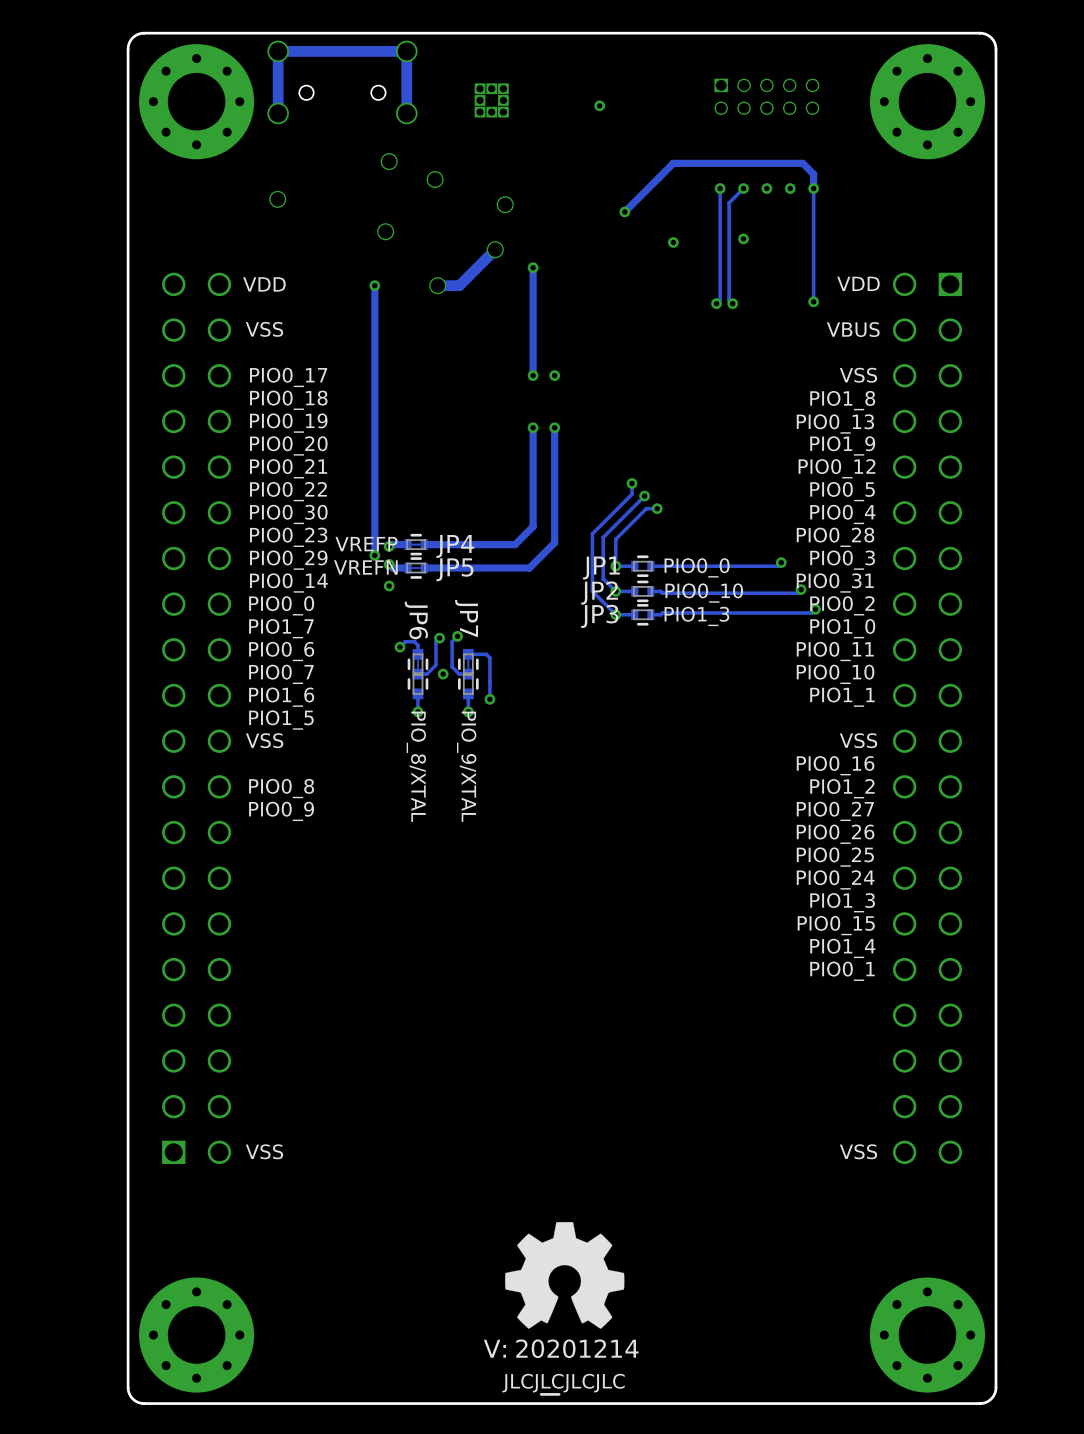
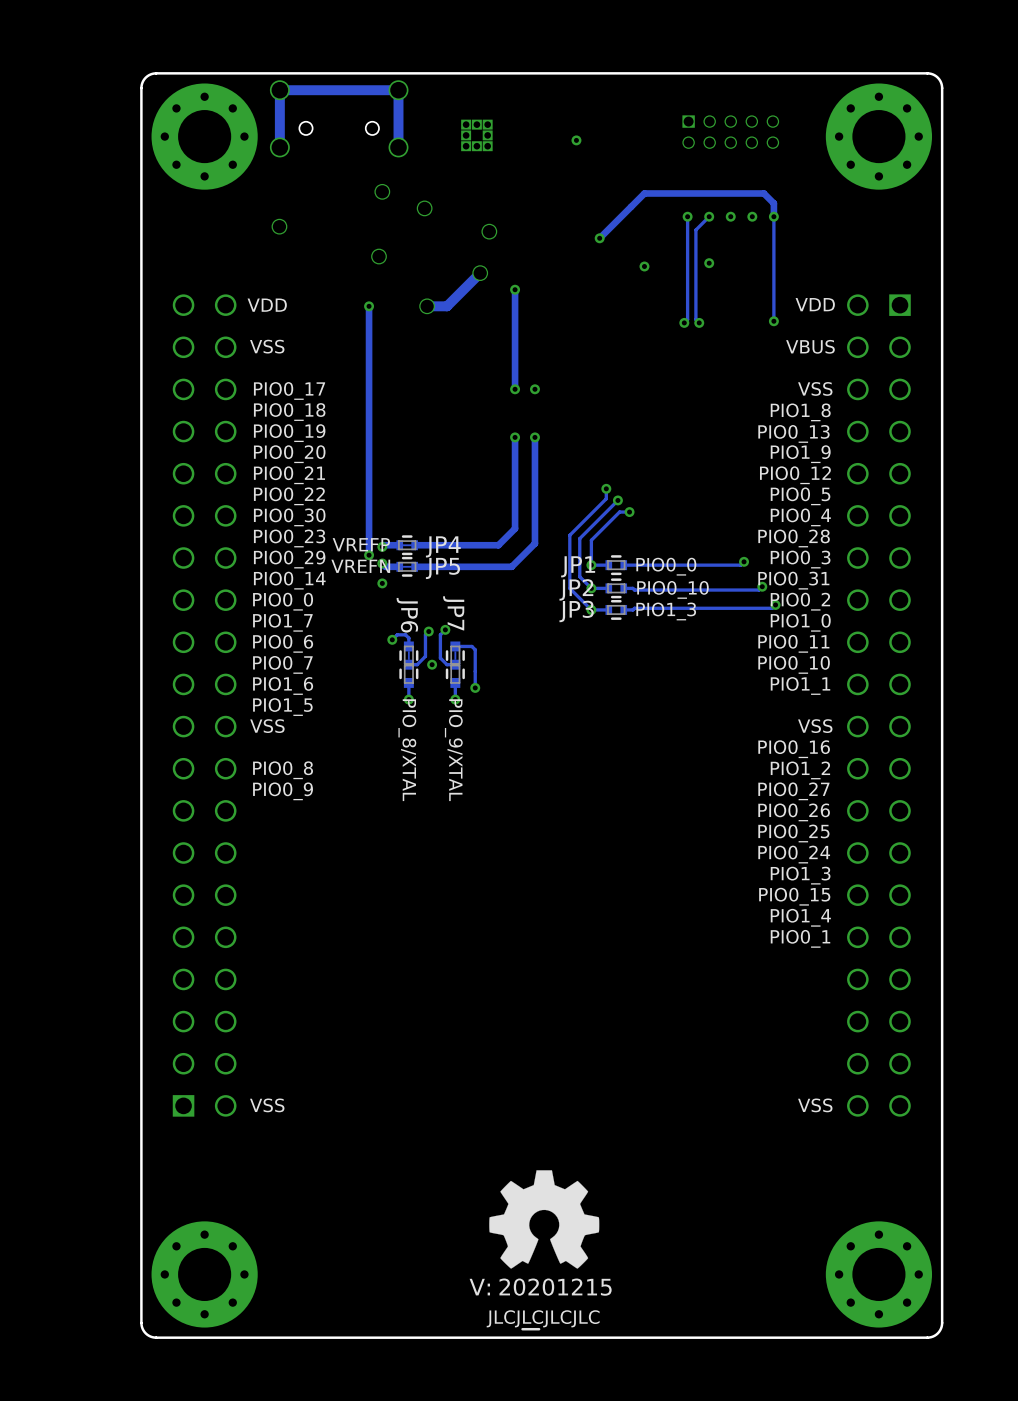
drawing shape: [483, 1339, 639, 1359] -> [469, 1278, 612, 1296]

